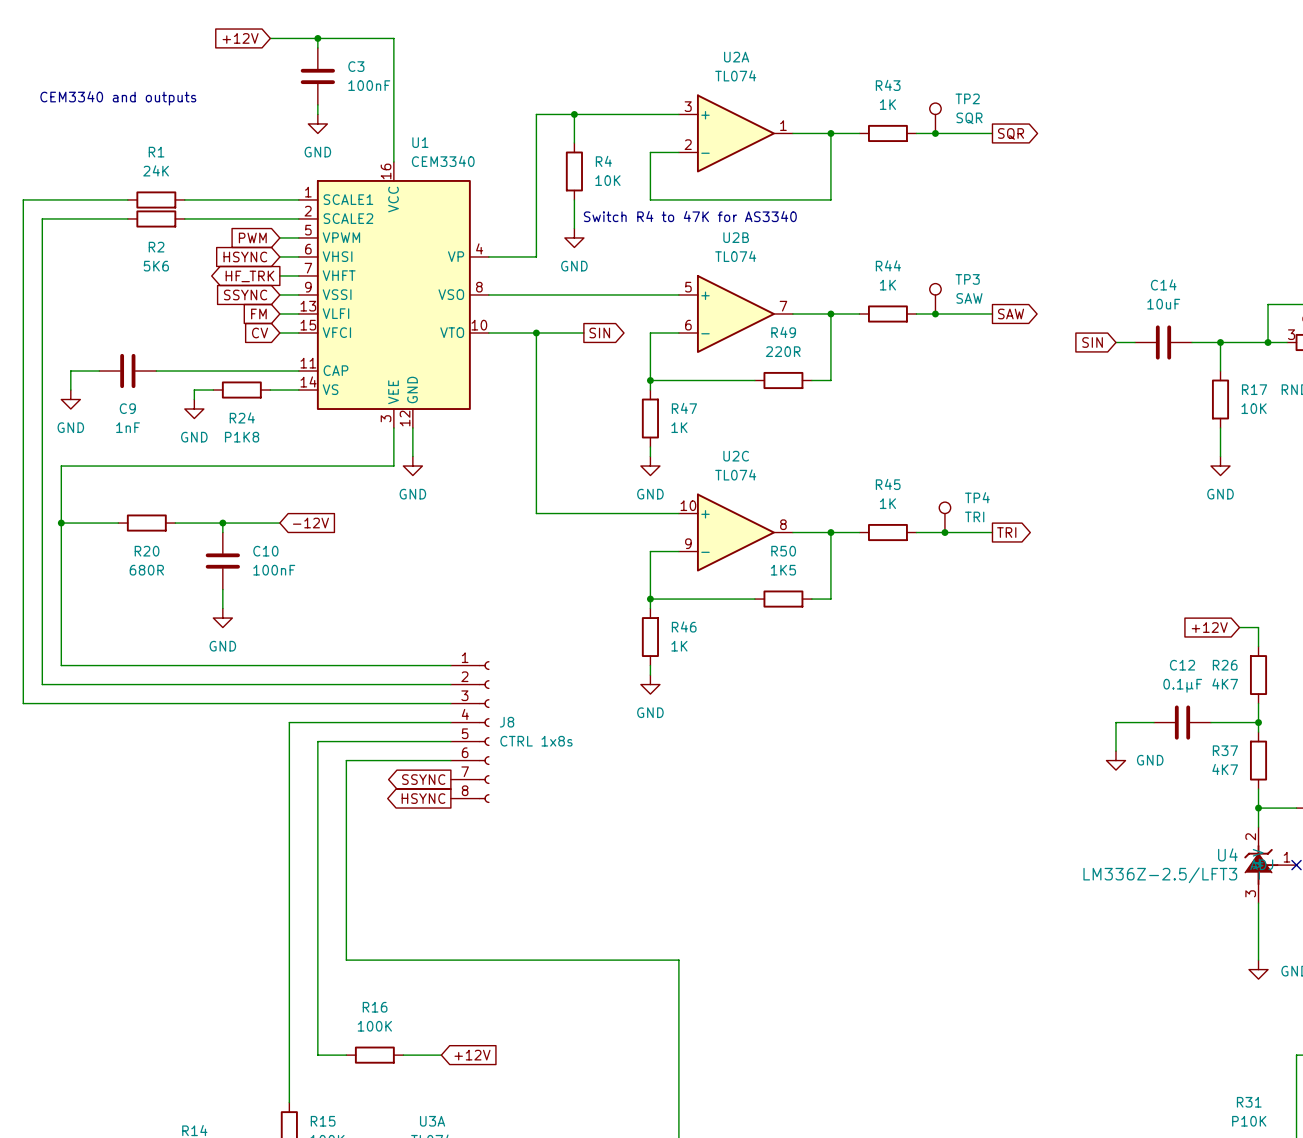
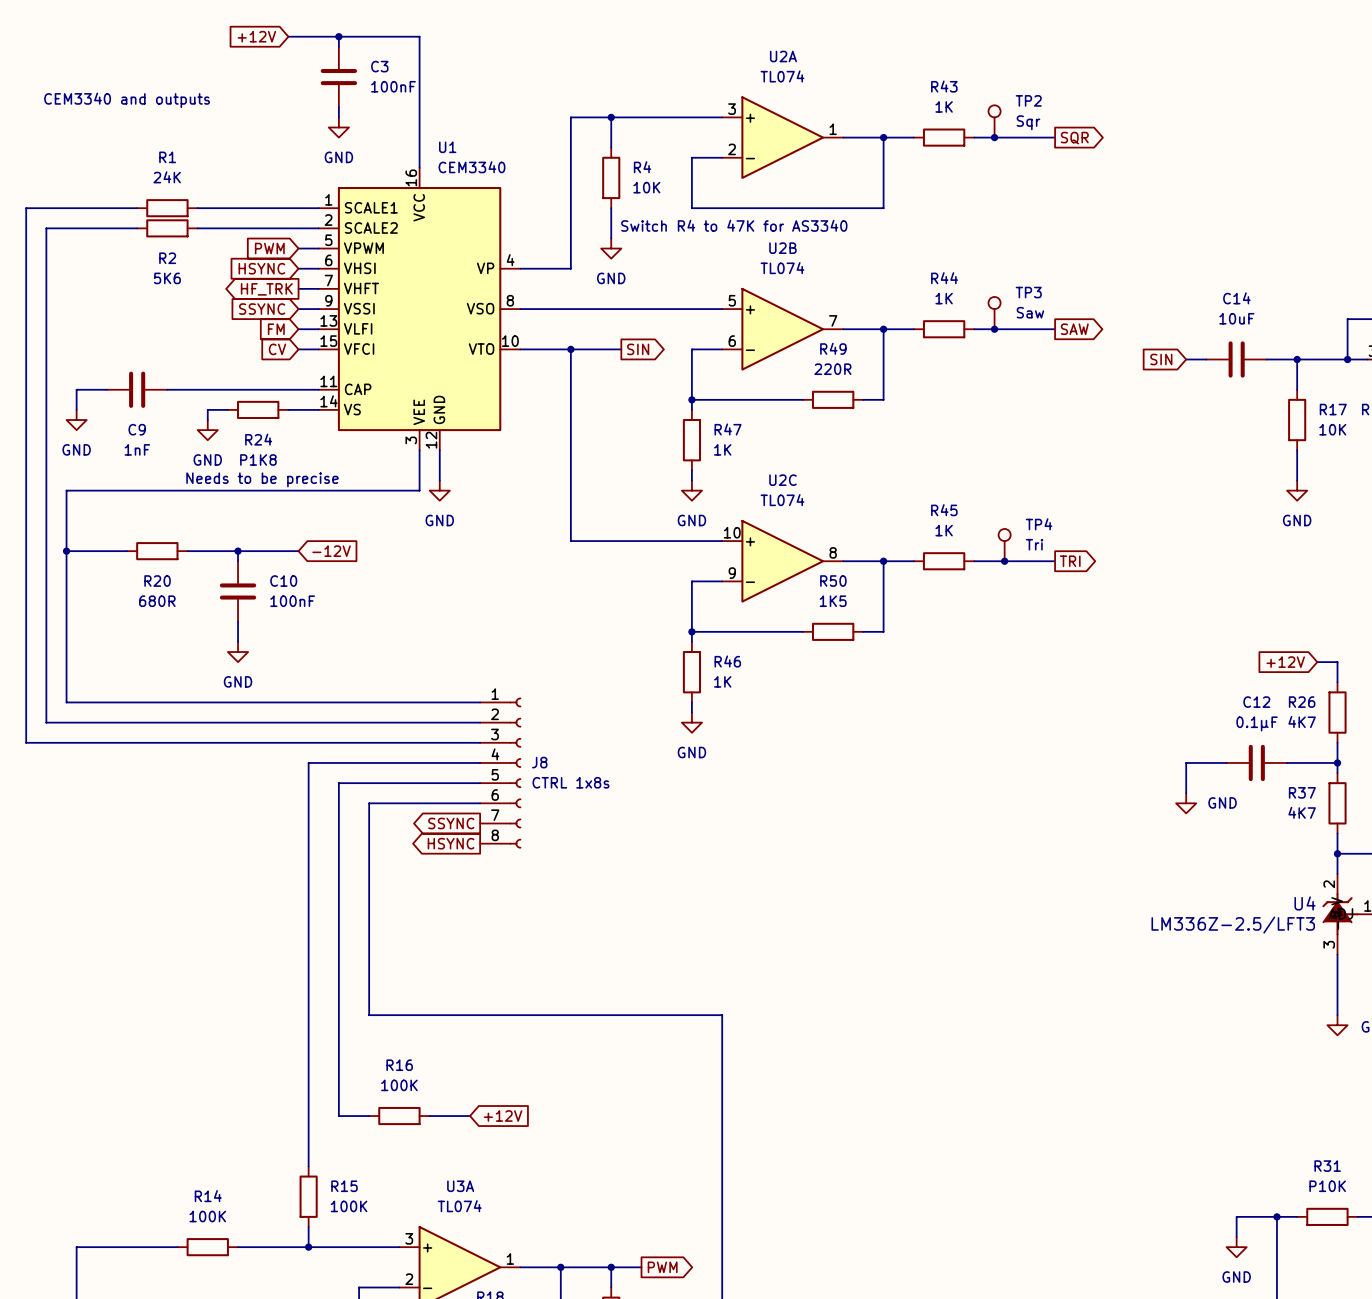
TP2 value: SQR (969, 118) -> Sqr (1028, 122)
TP3 value: SAW (969, 298) -> Saw (1030, 312)
text: none -> Needs to be precise (262, 479)
TP4 value: TRI (974, 516) -> Tri (1034, 544)

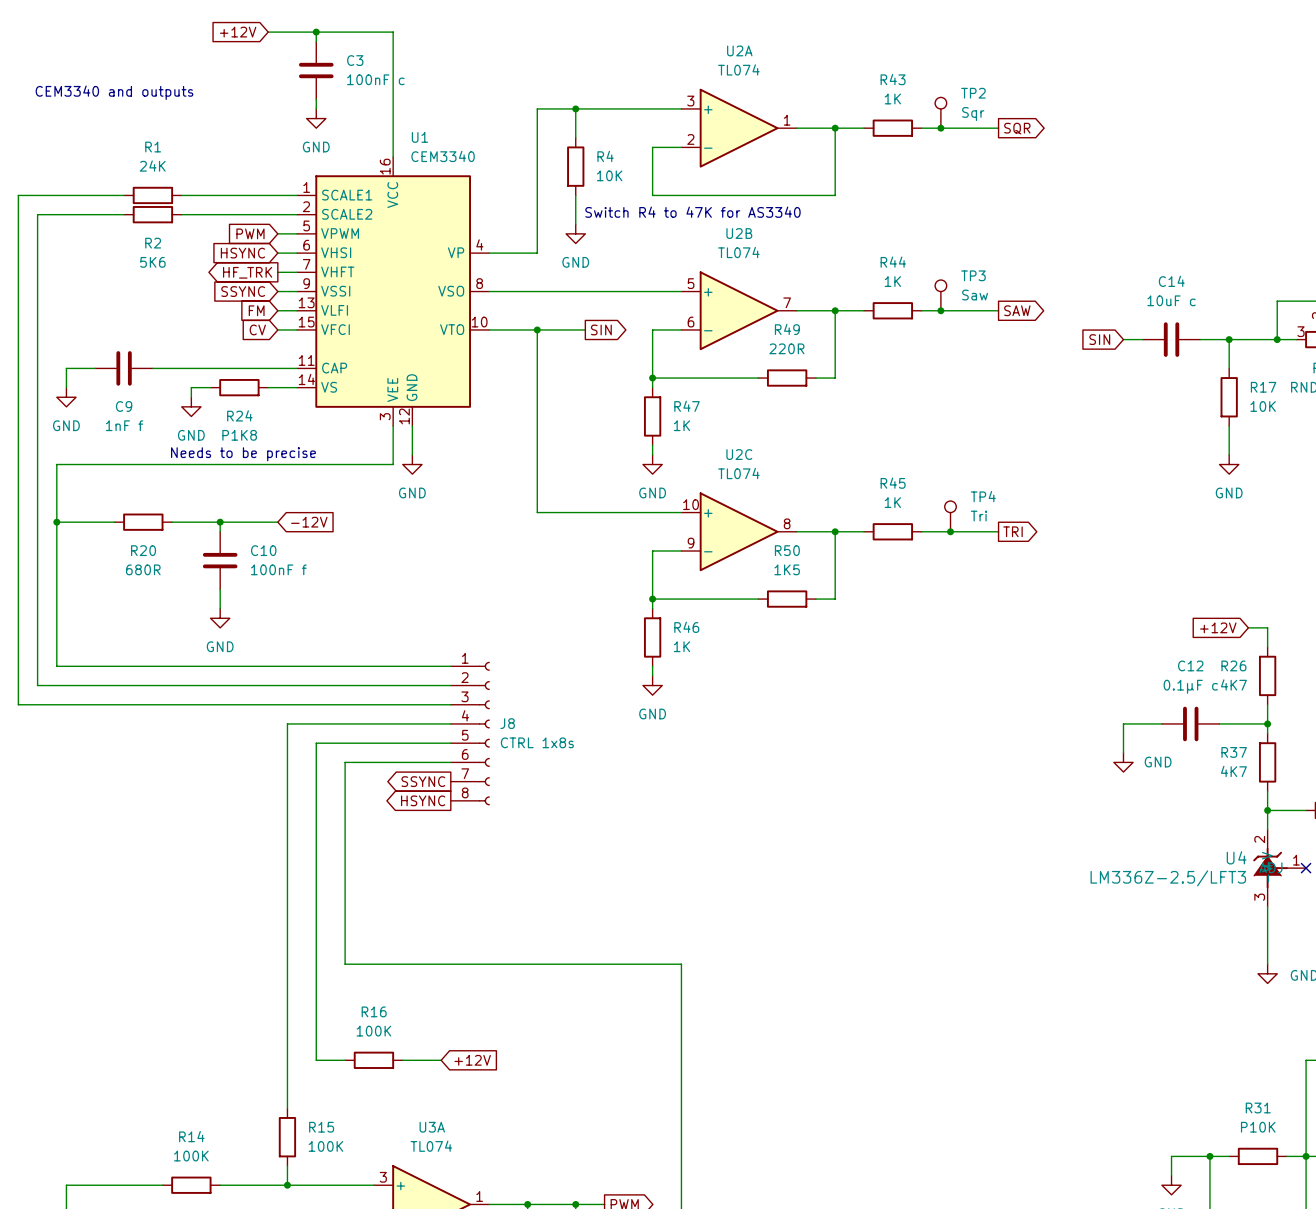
C3 value: 100nF (393, 86) -> 100nF c (375, 79)
C14 value: 10uF (1236, 318) -> 10uF c (1171, 300)
C9 value: 1nF (137, 449) -> 1nF f (124, 425)
C10 value: 100nF (292, 601) -> 100nF f (278, 569)
C12 value: 0.1μF (1257, 723) -> 0.1μF c (1190, 686)

